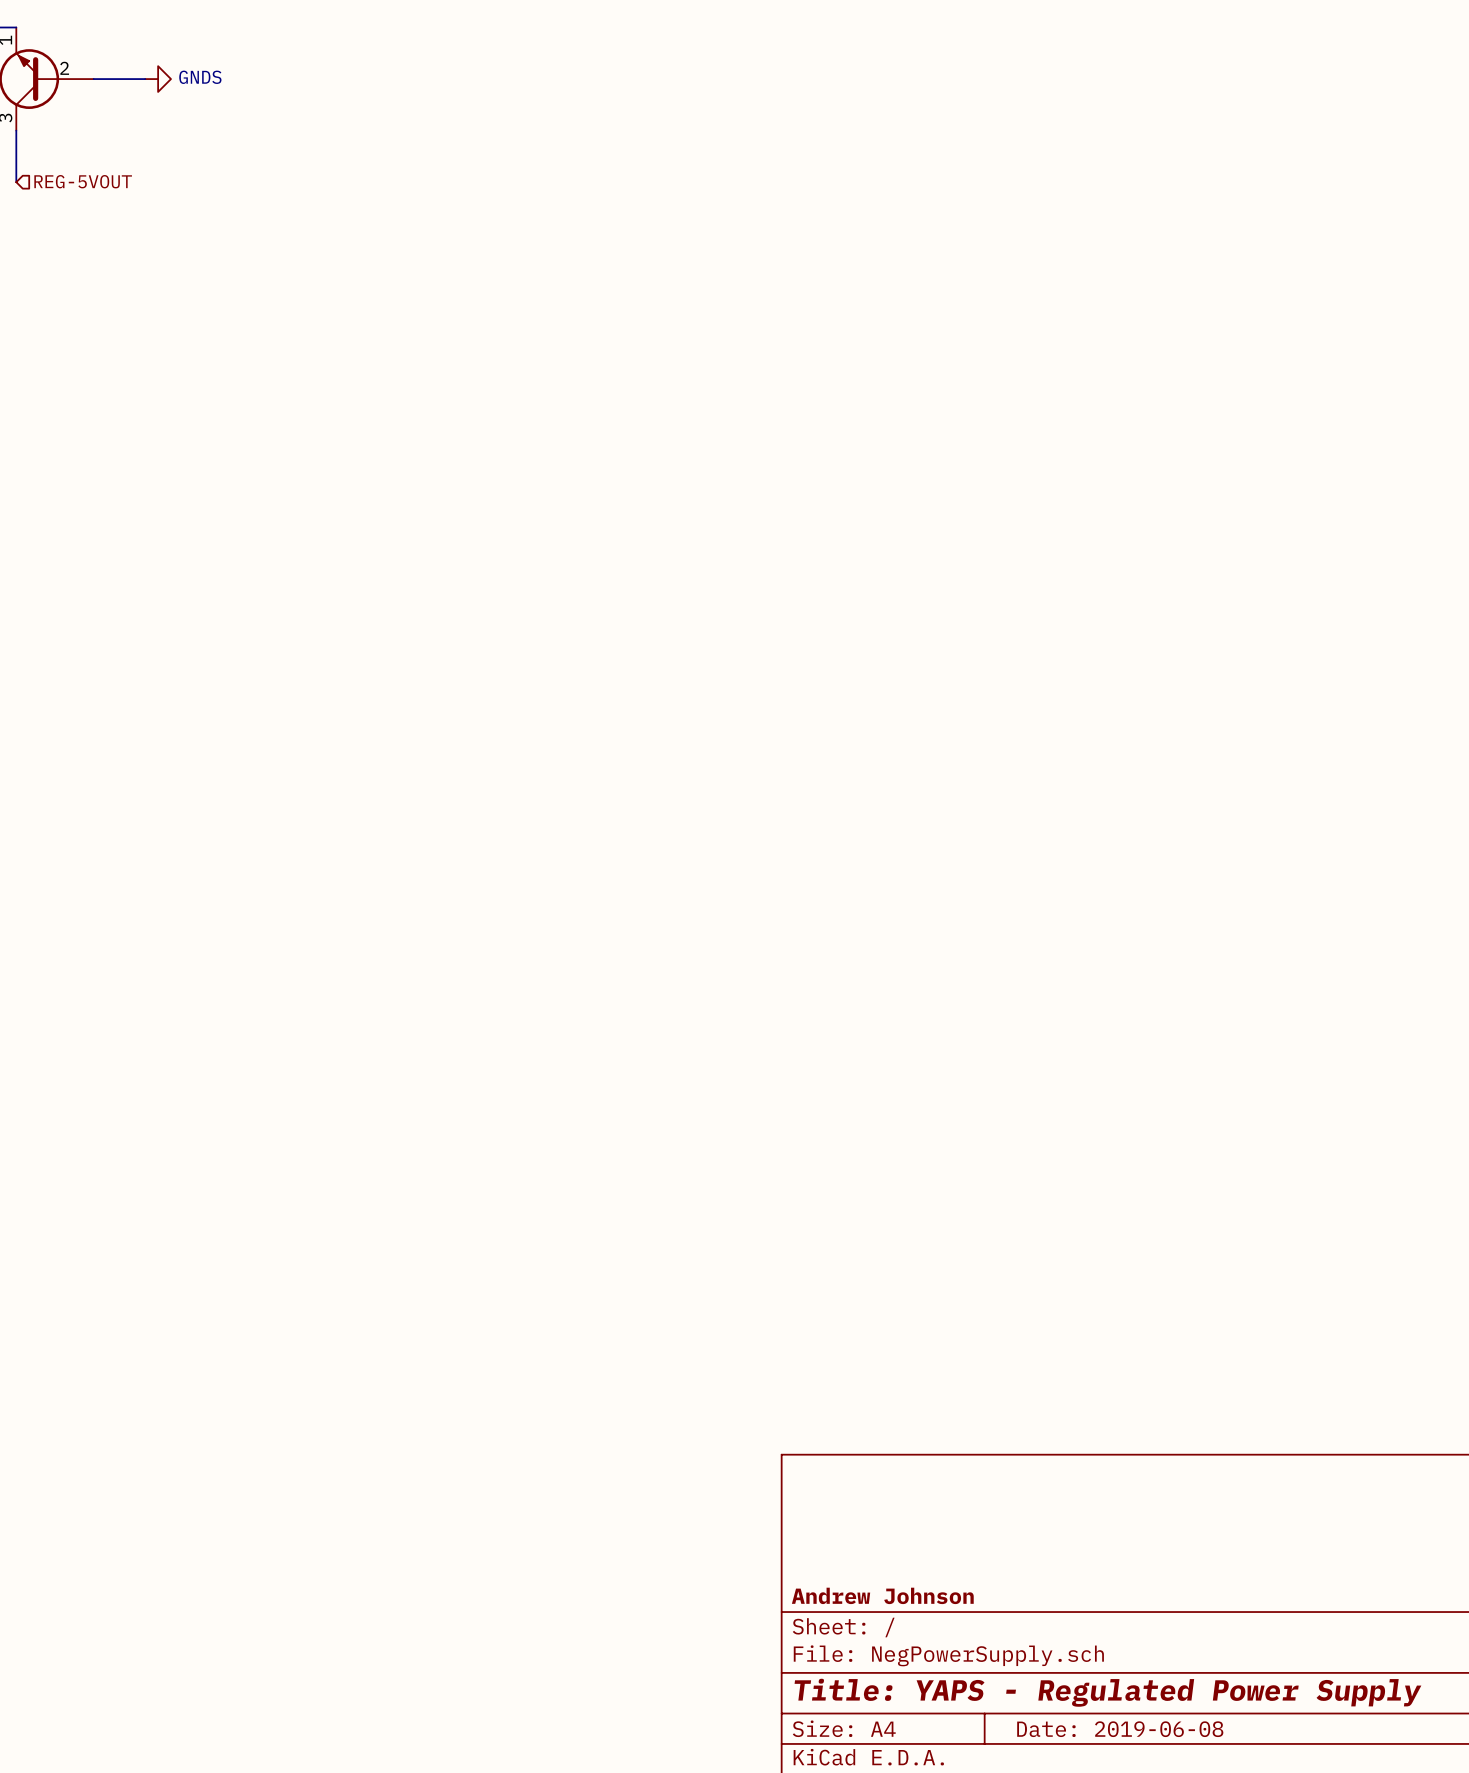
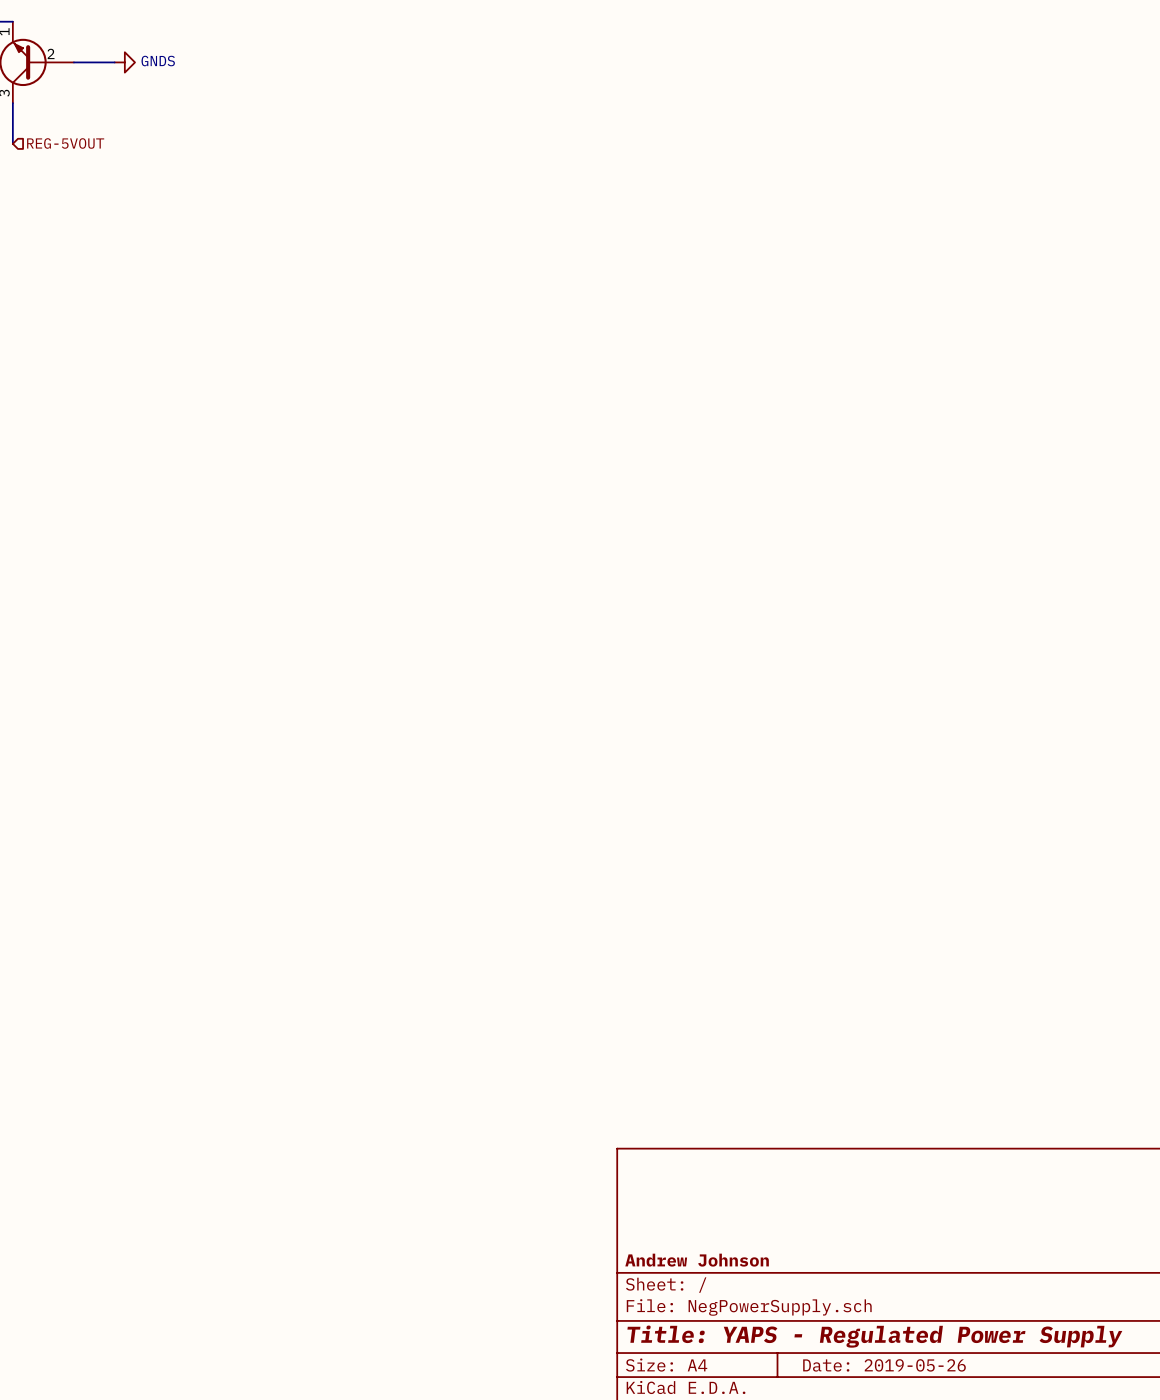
title block: Date: 2019-06-08 (1120, 1729) -> Date: 2019-05-26 (884, 1365)

